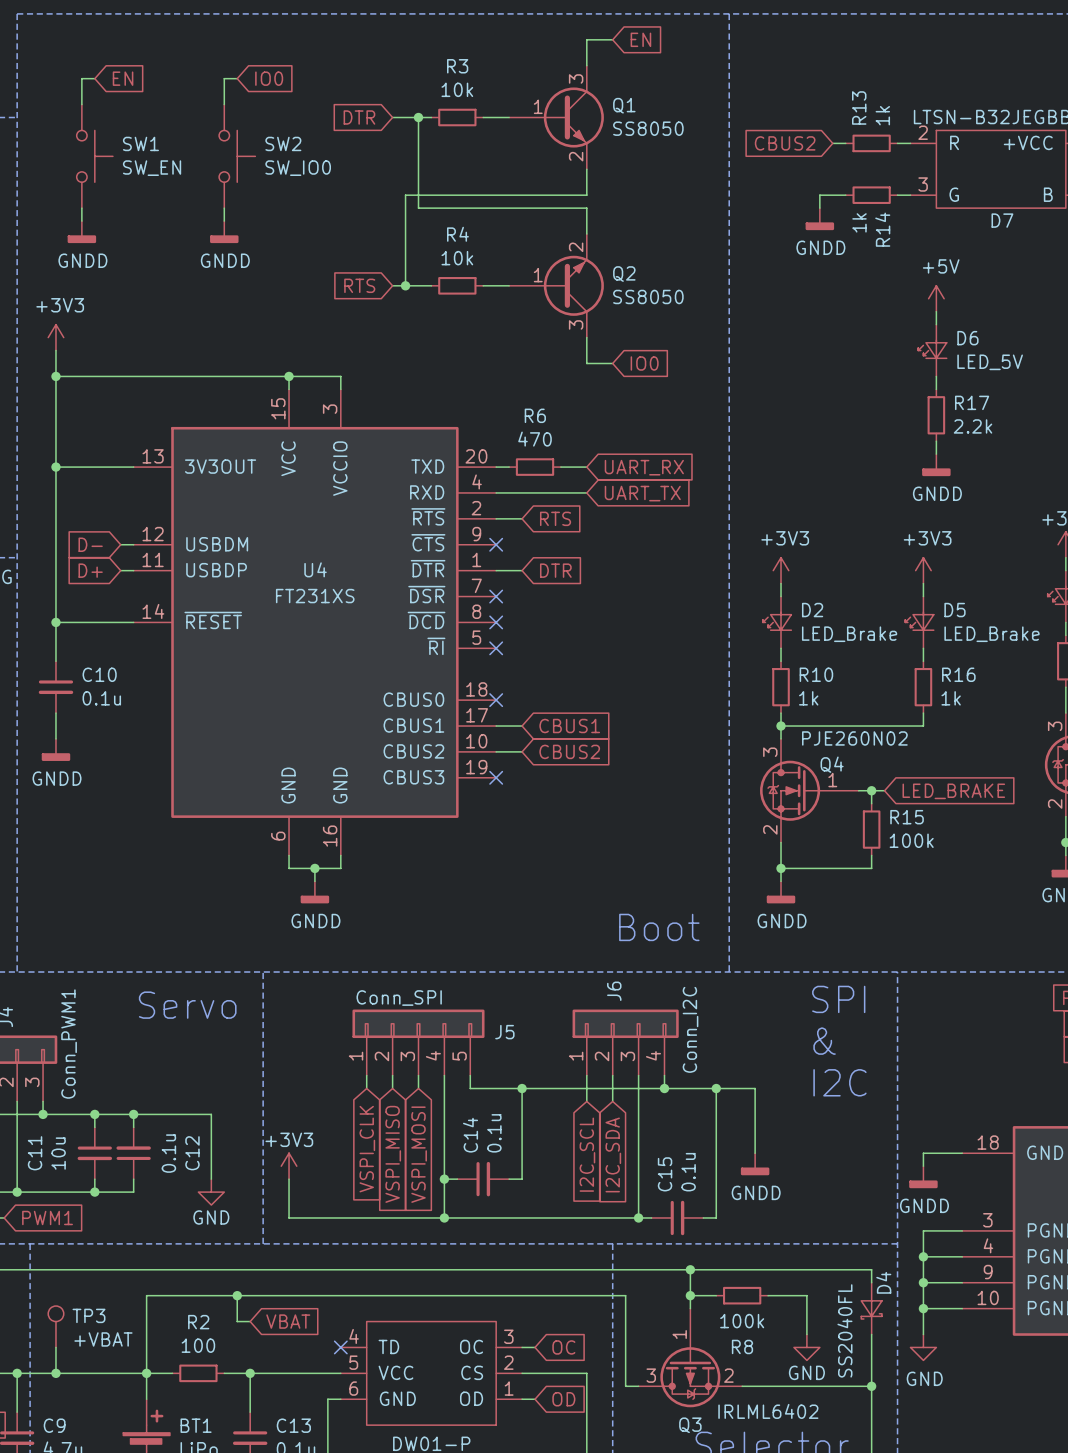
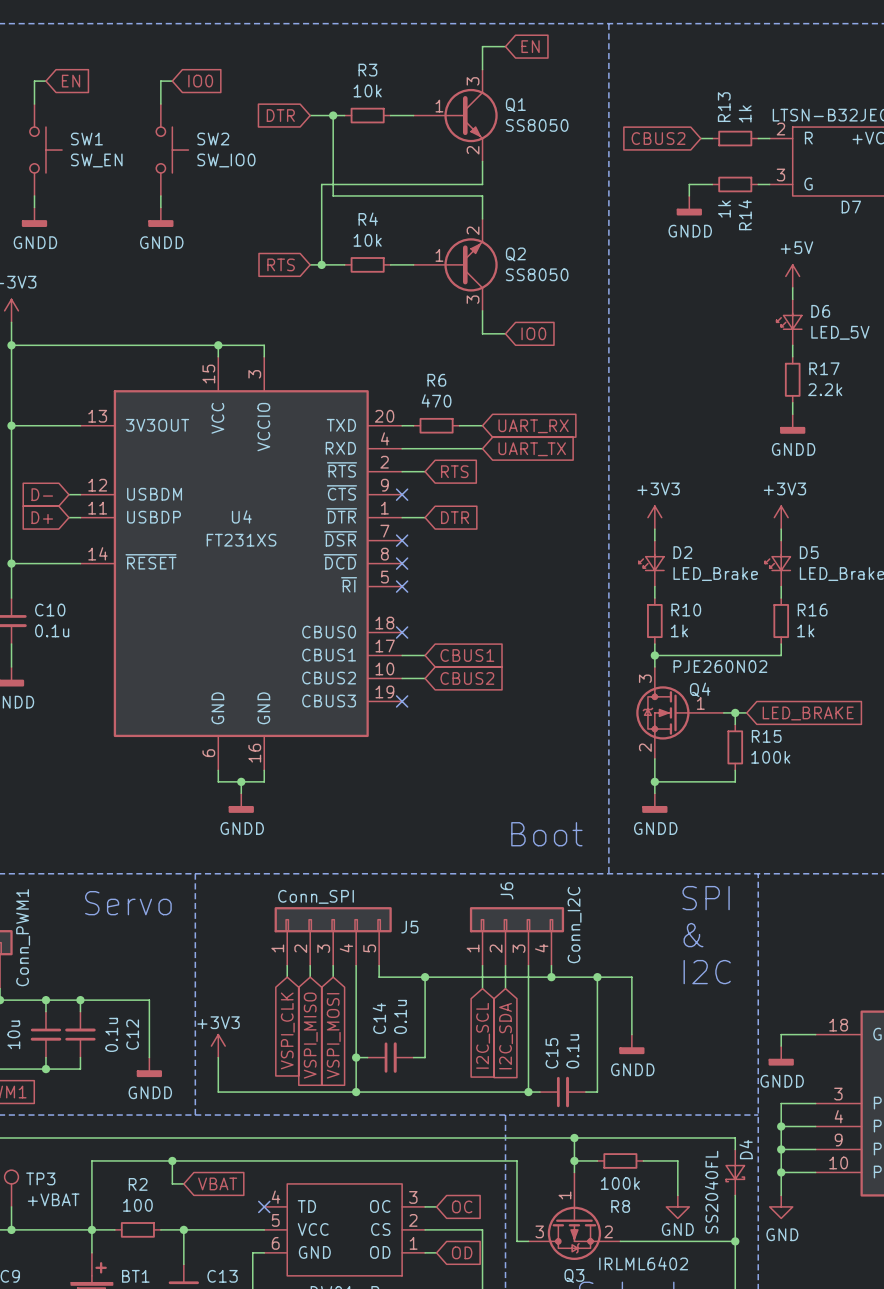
power symbol: GND (211, 1192) -> GNDD (149, 1067)

